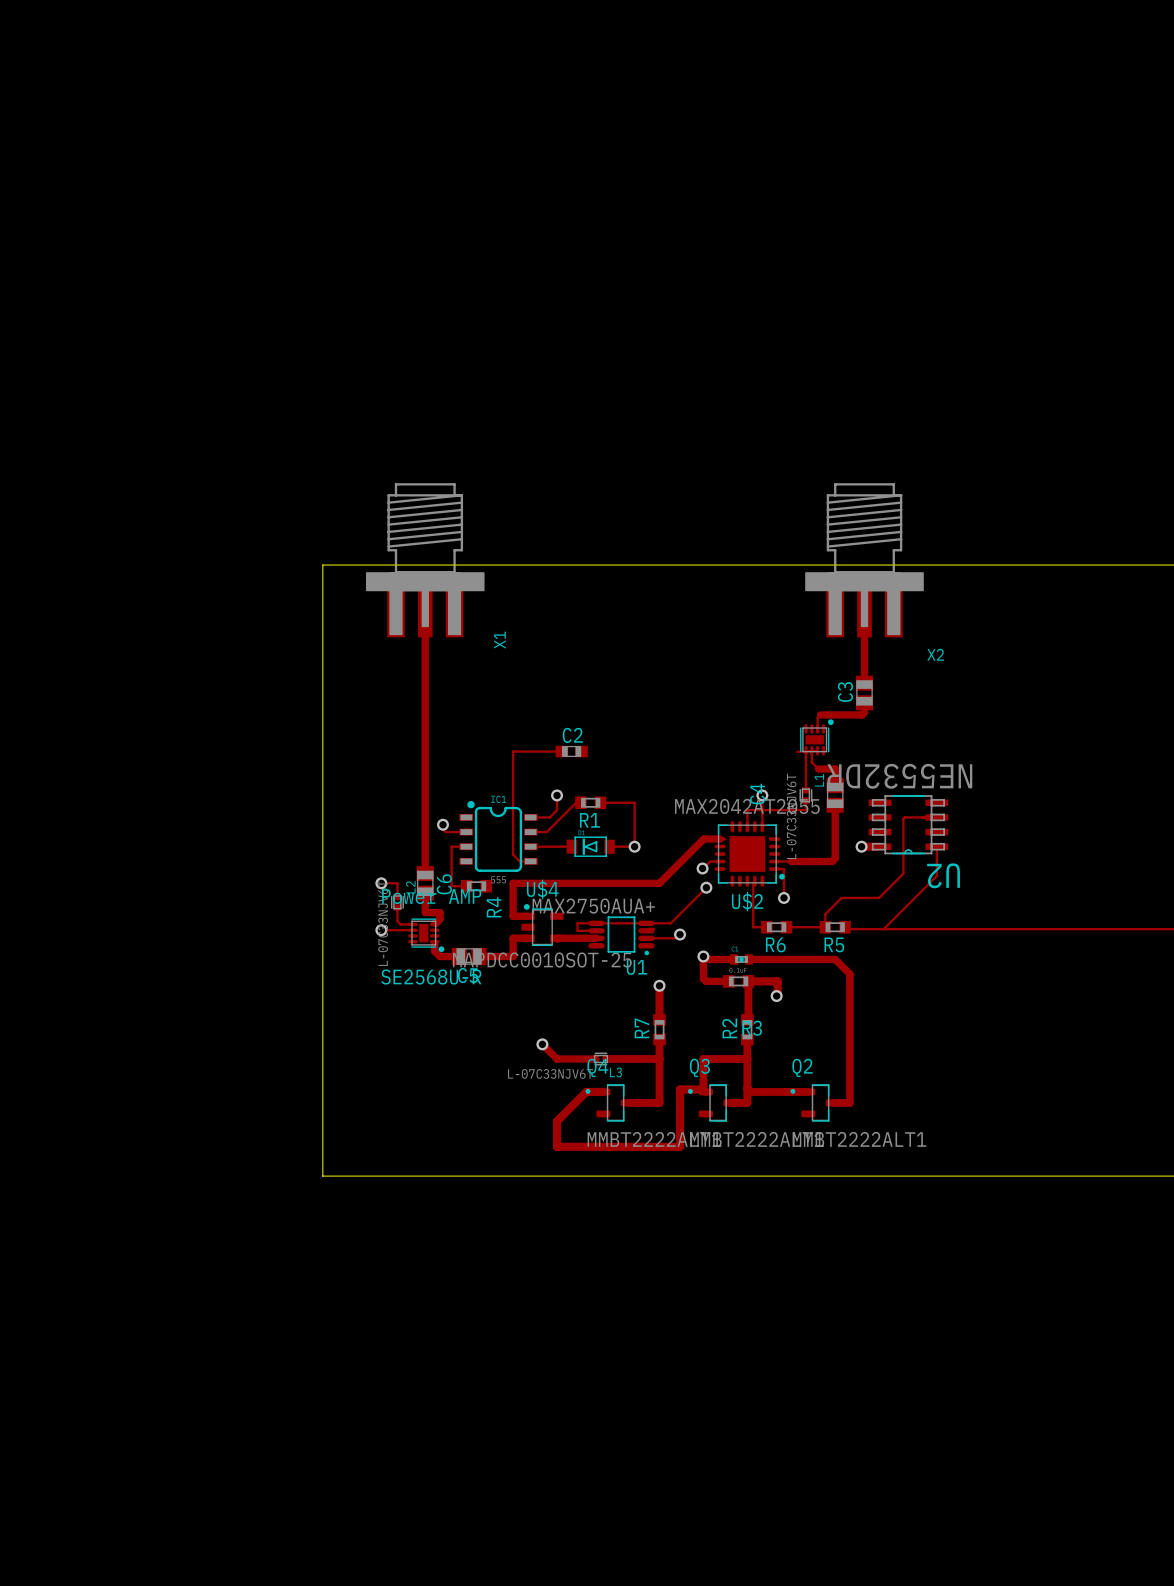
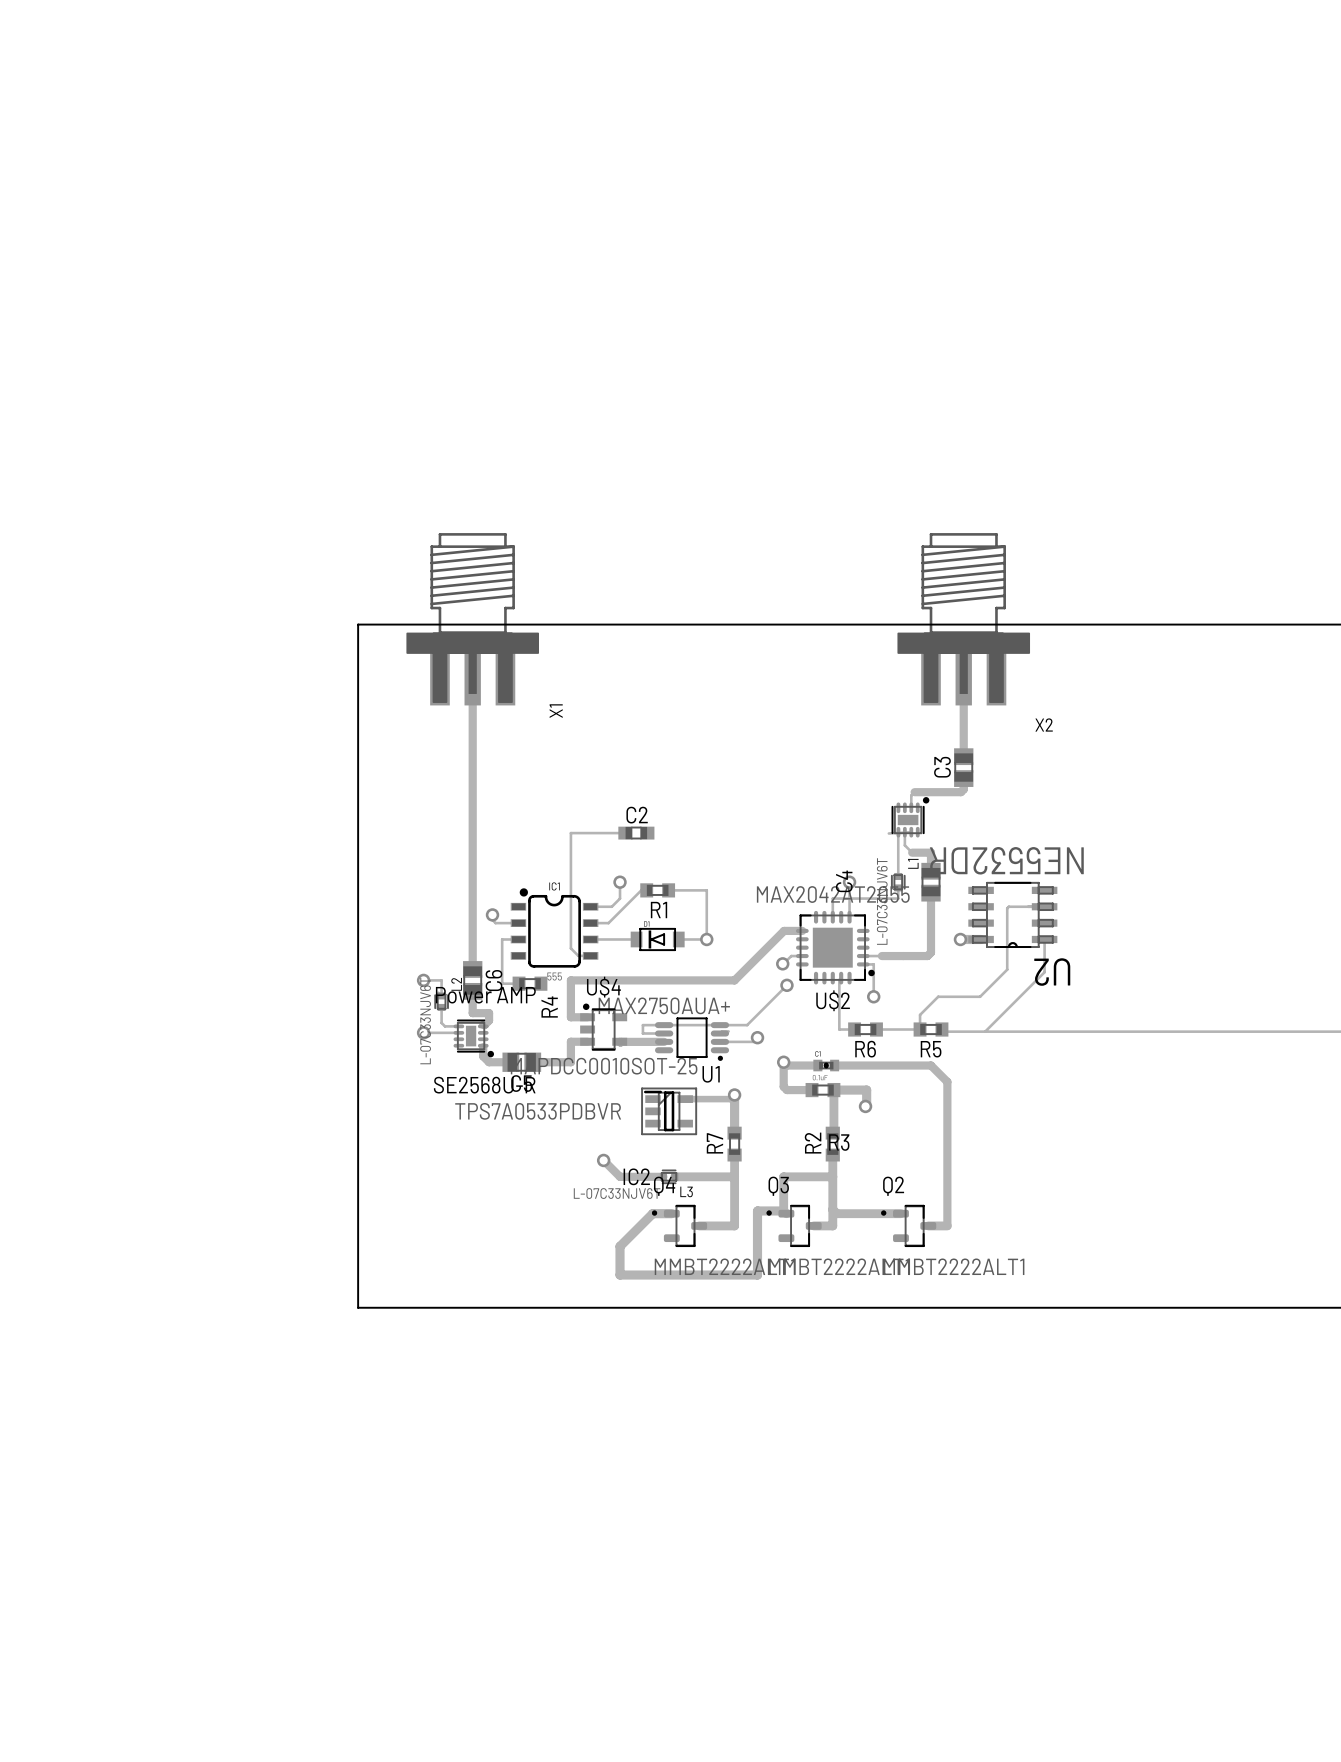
track: none -> (734, 1094) (730, 1099) (685, 1099)
IC2: none -> TPS7A0533PDBVR (669, 1111)

